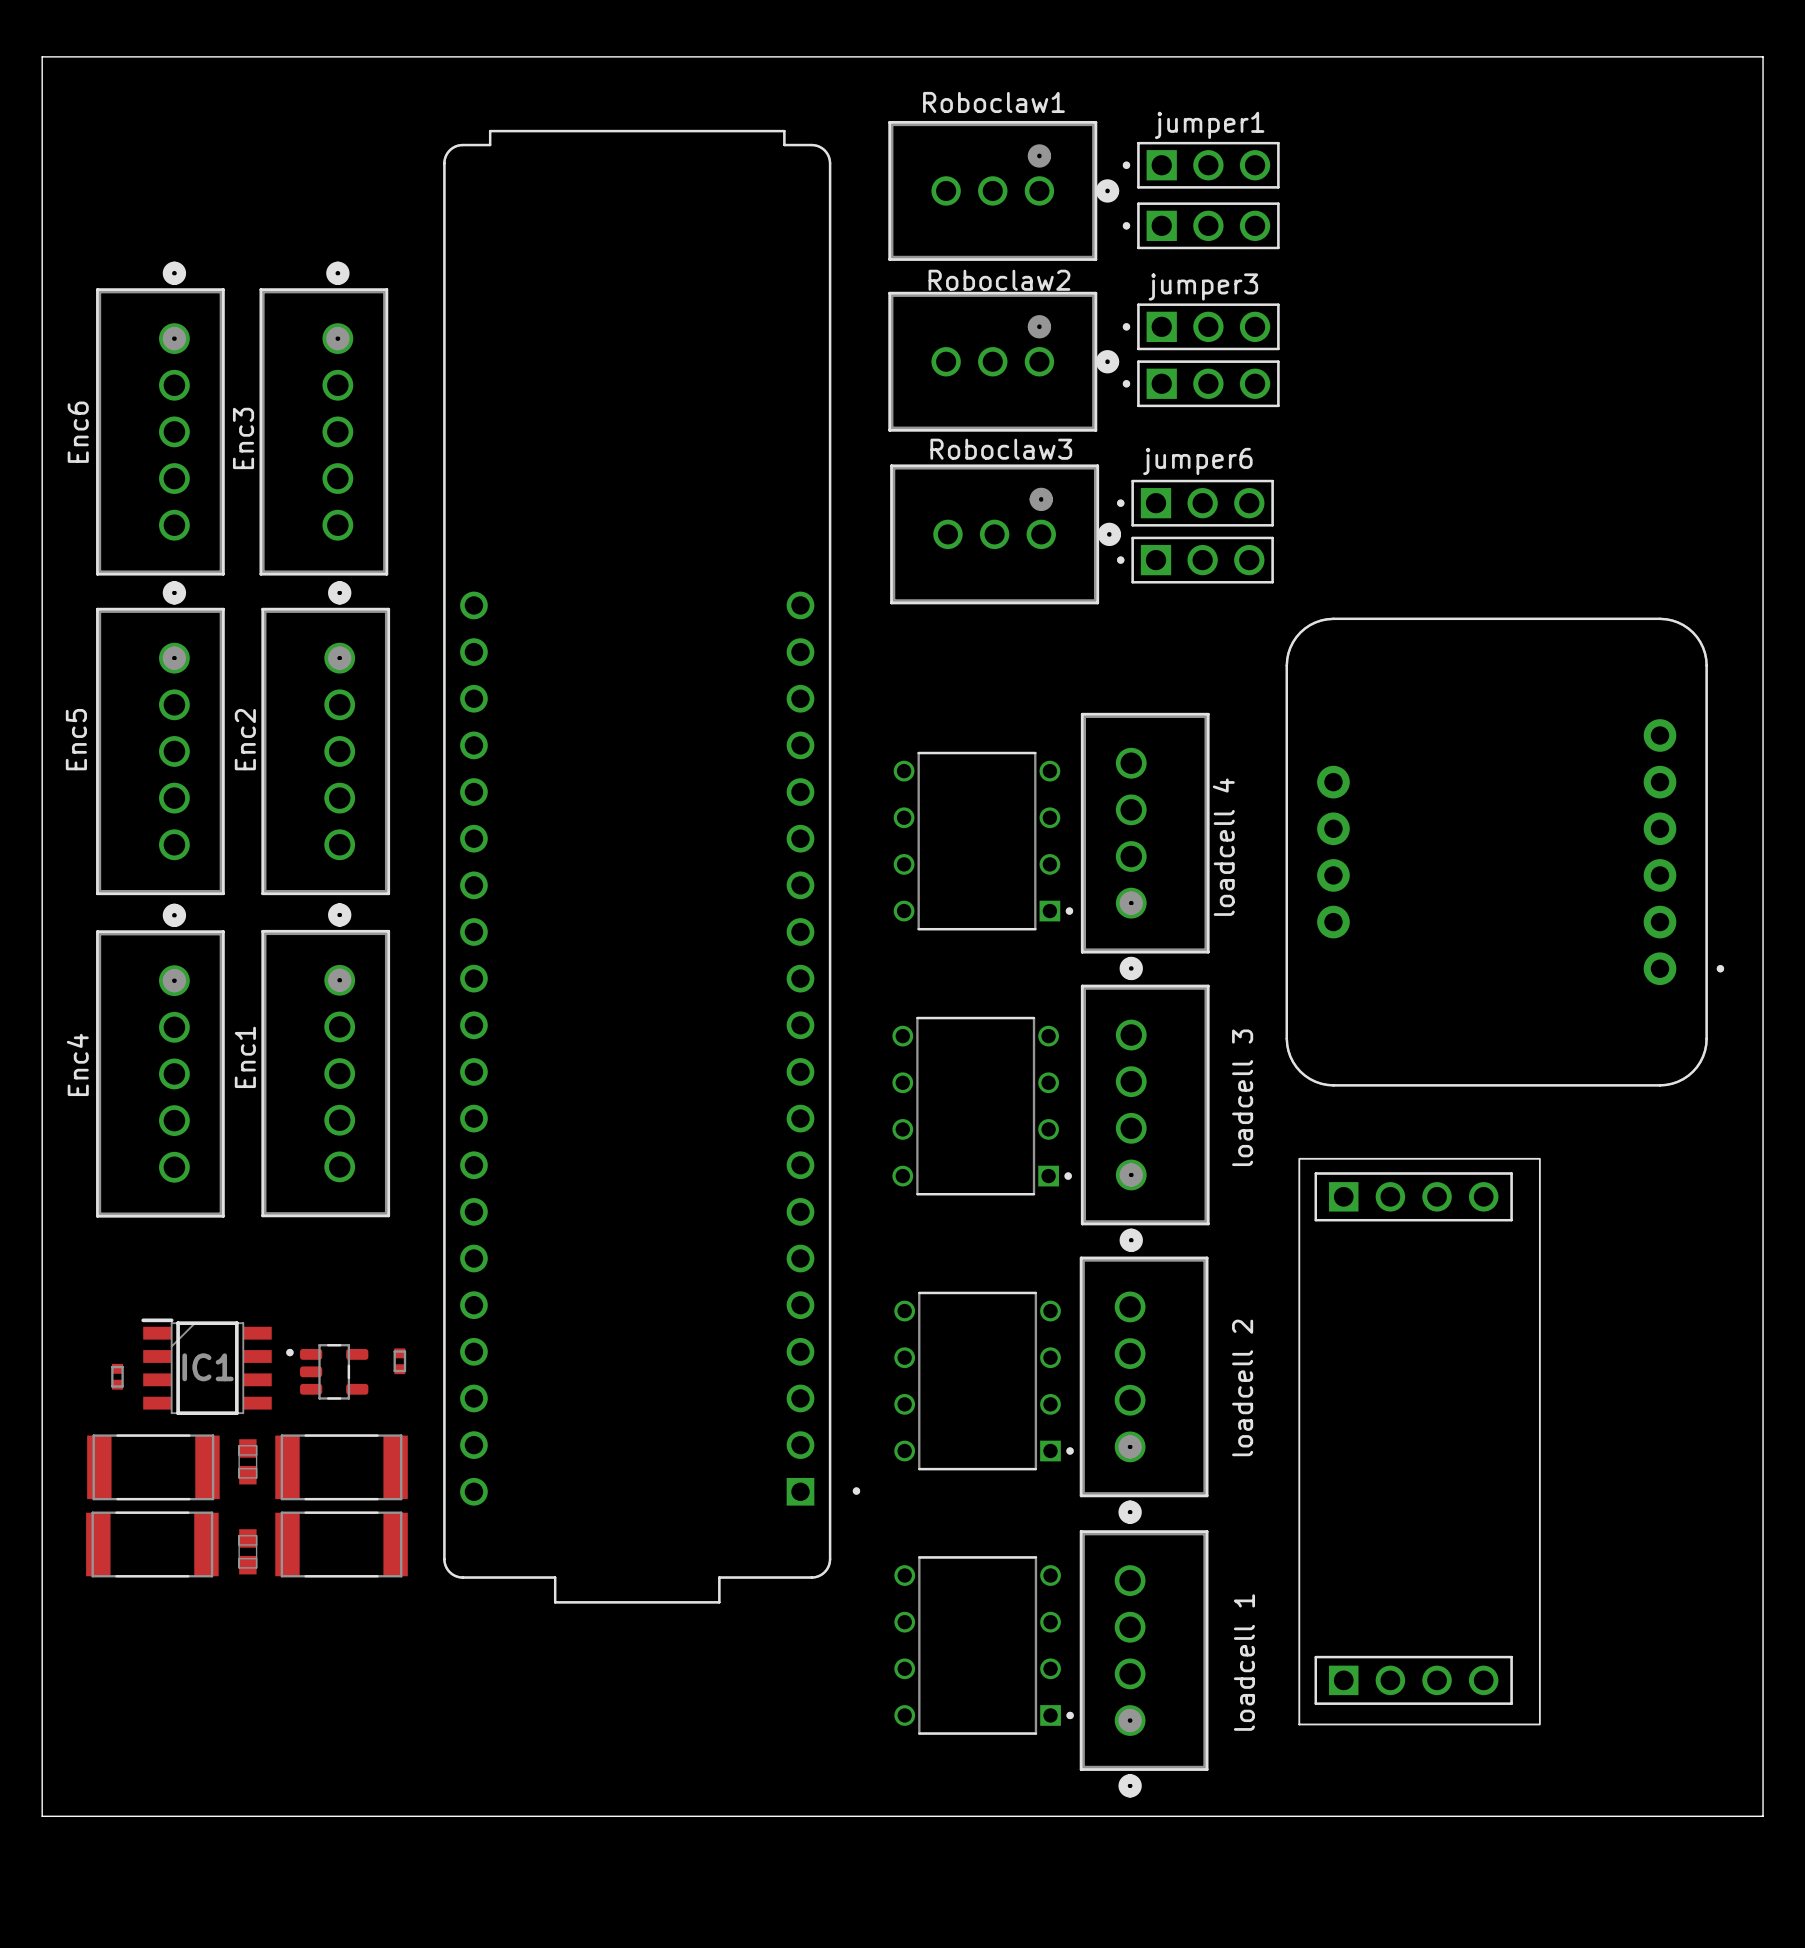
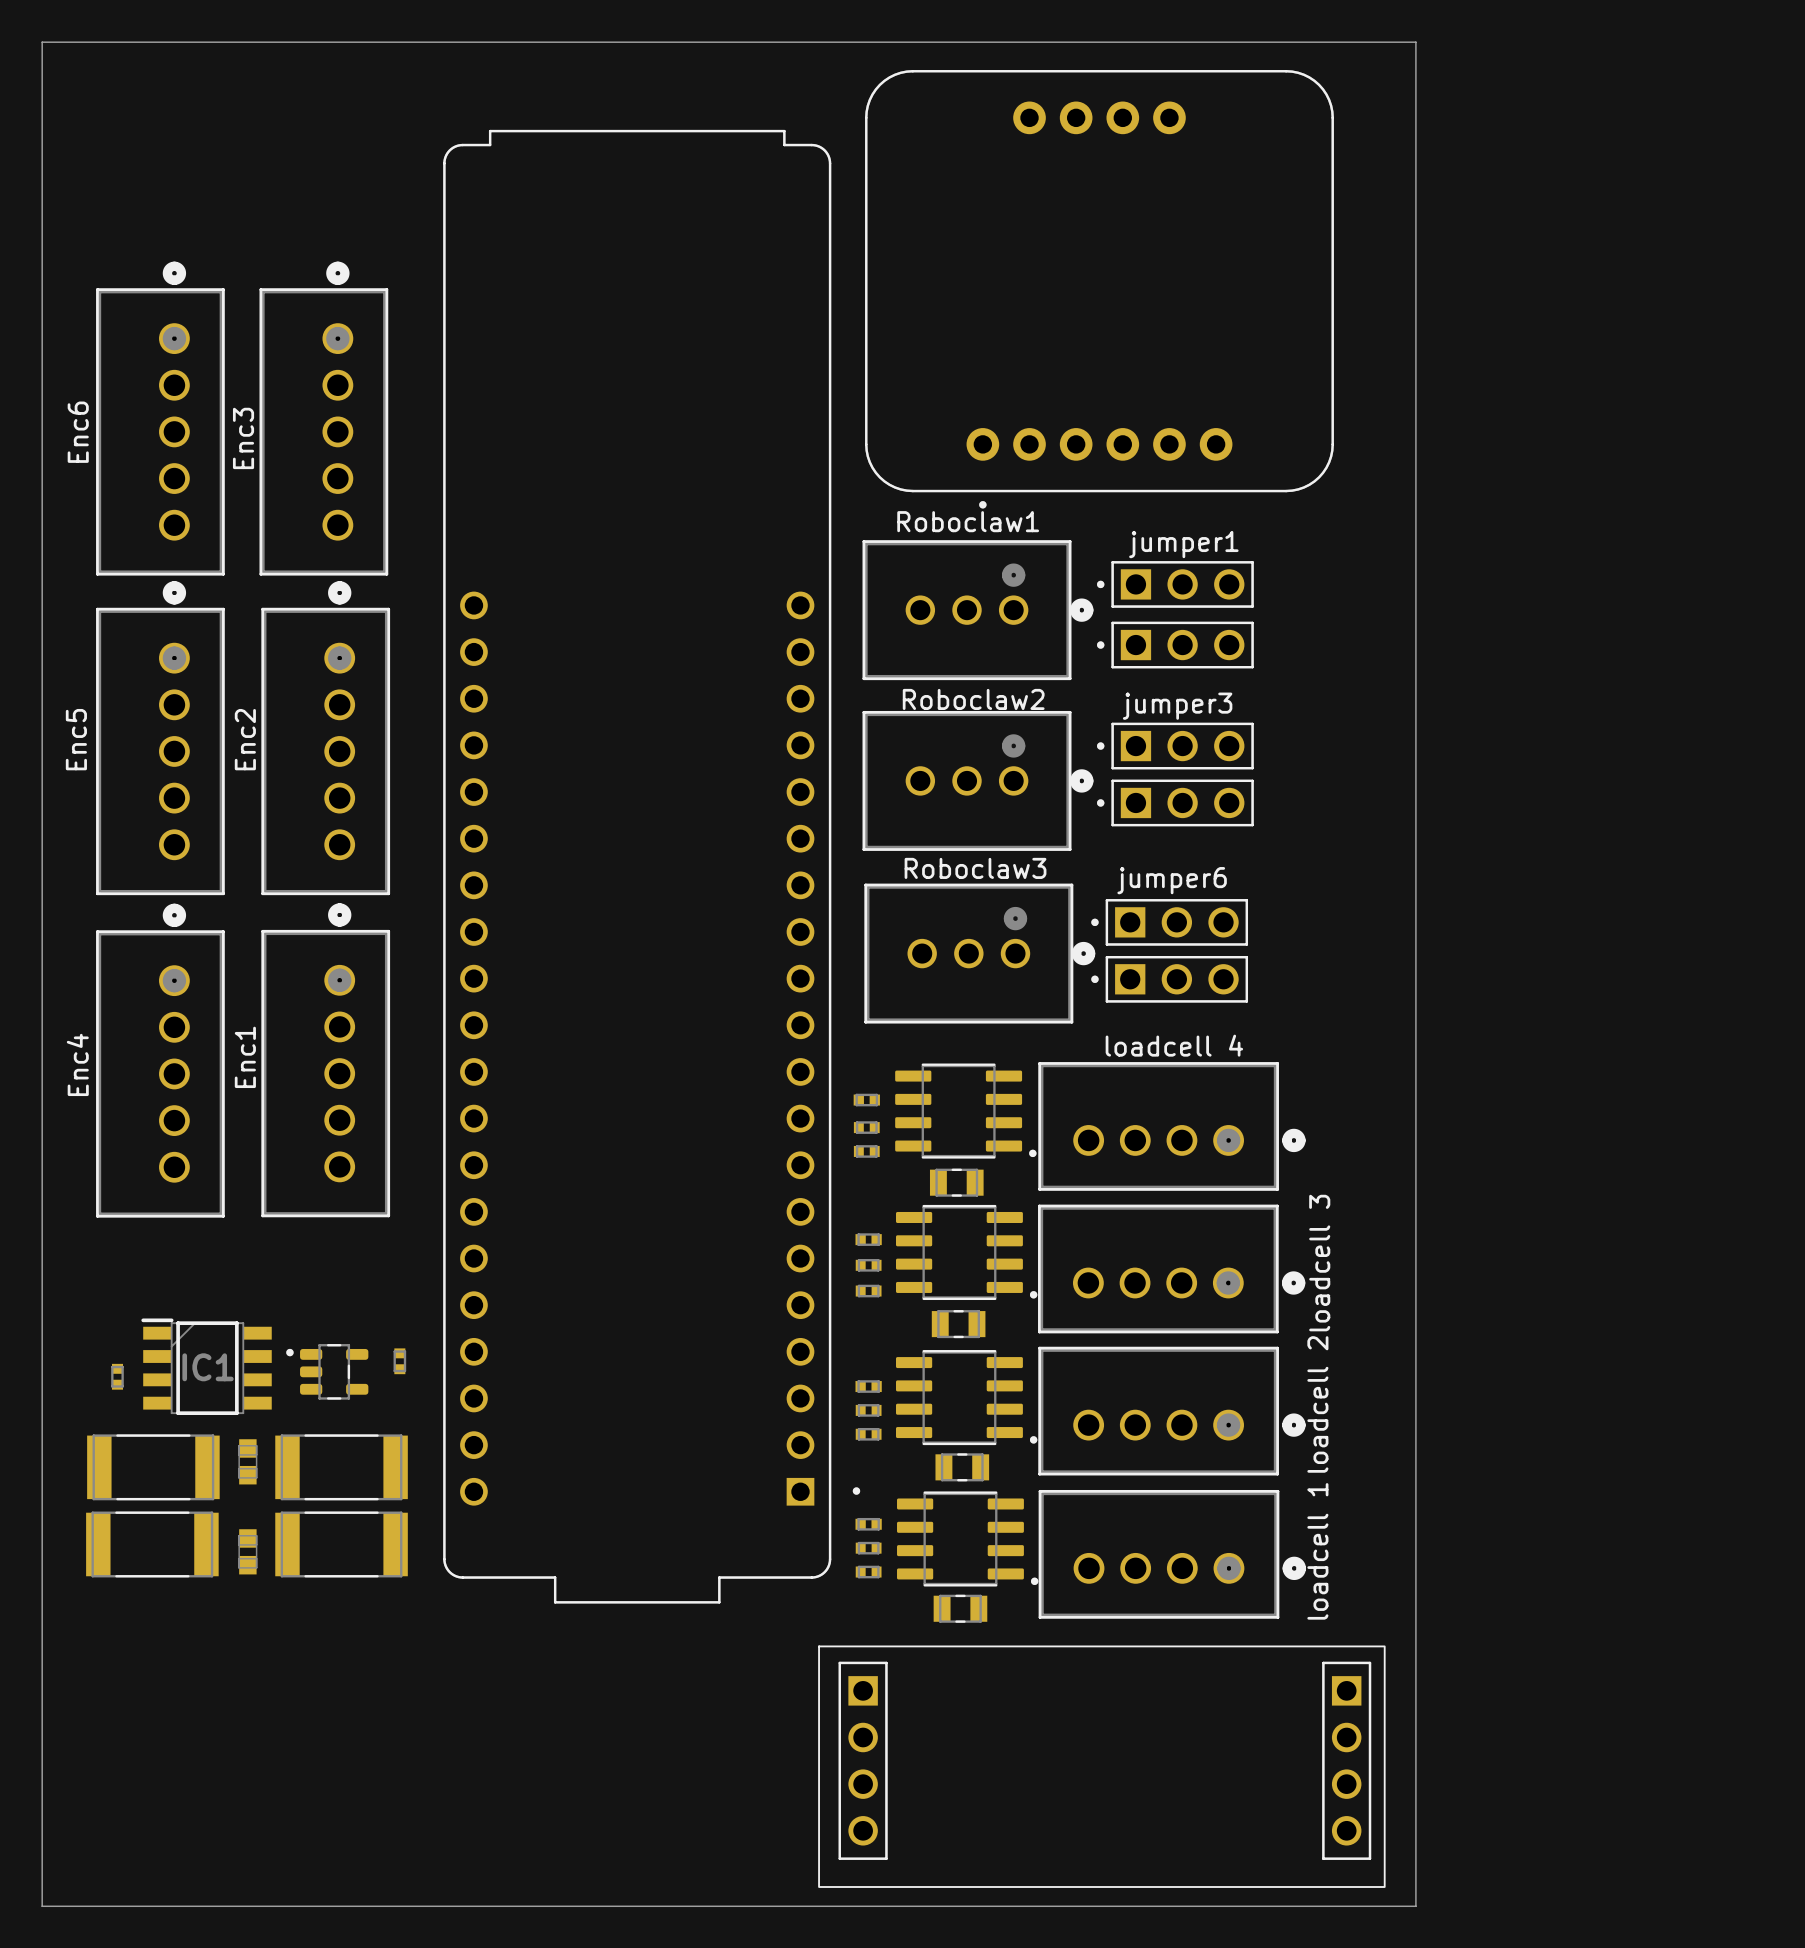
board edge: (42, 56) (1763, 56) (1763, 1816) (42, 1816) -> (42, 56) (42, 42) (1415, 42) (1415, 1906) (42, 1906) (42, 1816)
part position: (1201, 165) -> (1175, 584)
part position: (1003, 190) -> (977, 610)
part: (1201, 225) -> none
part: none -> (1099, 289)
part position: (1201, 326) -> (1175, 746)
part position: (1003, 361) -> (977, 780)
part: (1201, 383) -> none
part: (1195, 503) -> none
part position: (1005, 534) -> (979, 953)
part position: (1195, 560) -> (1169, 979)
part: none -> (1175, 645)
part: none -> (1175, 802)
part: (983, 841) -> none
part rotation: 0° (1145, 846) -> 90° counterclockwise (1171, 1126)
part position: (1145, 846) -> (1171, 1126)
part: (1504, 852) -> none
part: none -> (1169, 922)
part footprint: [892, 1016, 1072, 1196] -> [895, 1063, 1037, 1159]
part value position: loadcell 3 (1242, 1097) -> loadcell 3 (1319, 1263)
part: none -> (866, 1100)
part rotation: 0° (1145, 1118) -> 90° counterclockwise (1171, 1269)
part: none -> (866, 1127)
part: none -> (866, 1151)
part: none -> (956, 1182)
part: none -> (868, 1239)
part: none -> (966, 1252)
part: none -> (868, 1265)
part: none -> (868, 1291)
part: none -> (958, 1324)
part: (984, 1381) -> none
part: none -> (868, 1386)
part value position: loadcell 2 (1242, 1387) -> loadcell 2 (1317, 1404)
part rotation: 0° (1144, 1390) -> 90° counterclockwise (1171, 1411)
part: none -> (966, 1397)
part: none -> (868, 1410)
part: none -> (868, 1434)
part rotation: 0° (1419, 1441) -> 90° clockwise (1101, 1766)
part position: (1419, 1441) -> (1101, 1766)
part: none -> (962, 1467)
part: none -> (868, 1524)
part: none -> (967, 1538)
part: none -> (868, 1548)
part: none -> (868, 1572)
part: none -> (960, 1608)
part: (984, 1645) -> none
part value position: loadcell 1 (1244, 1662) -> loadcell 1 (1317, 1551)
part rotation: 0° (1144, 1663) -> 90° counterclockwise (1172, 1554)

